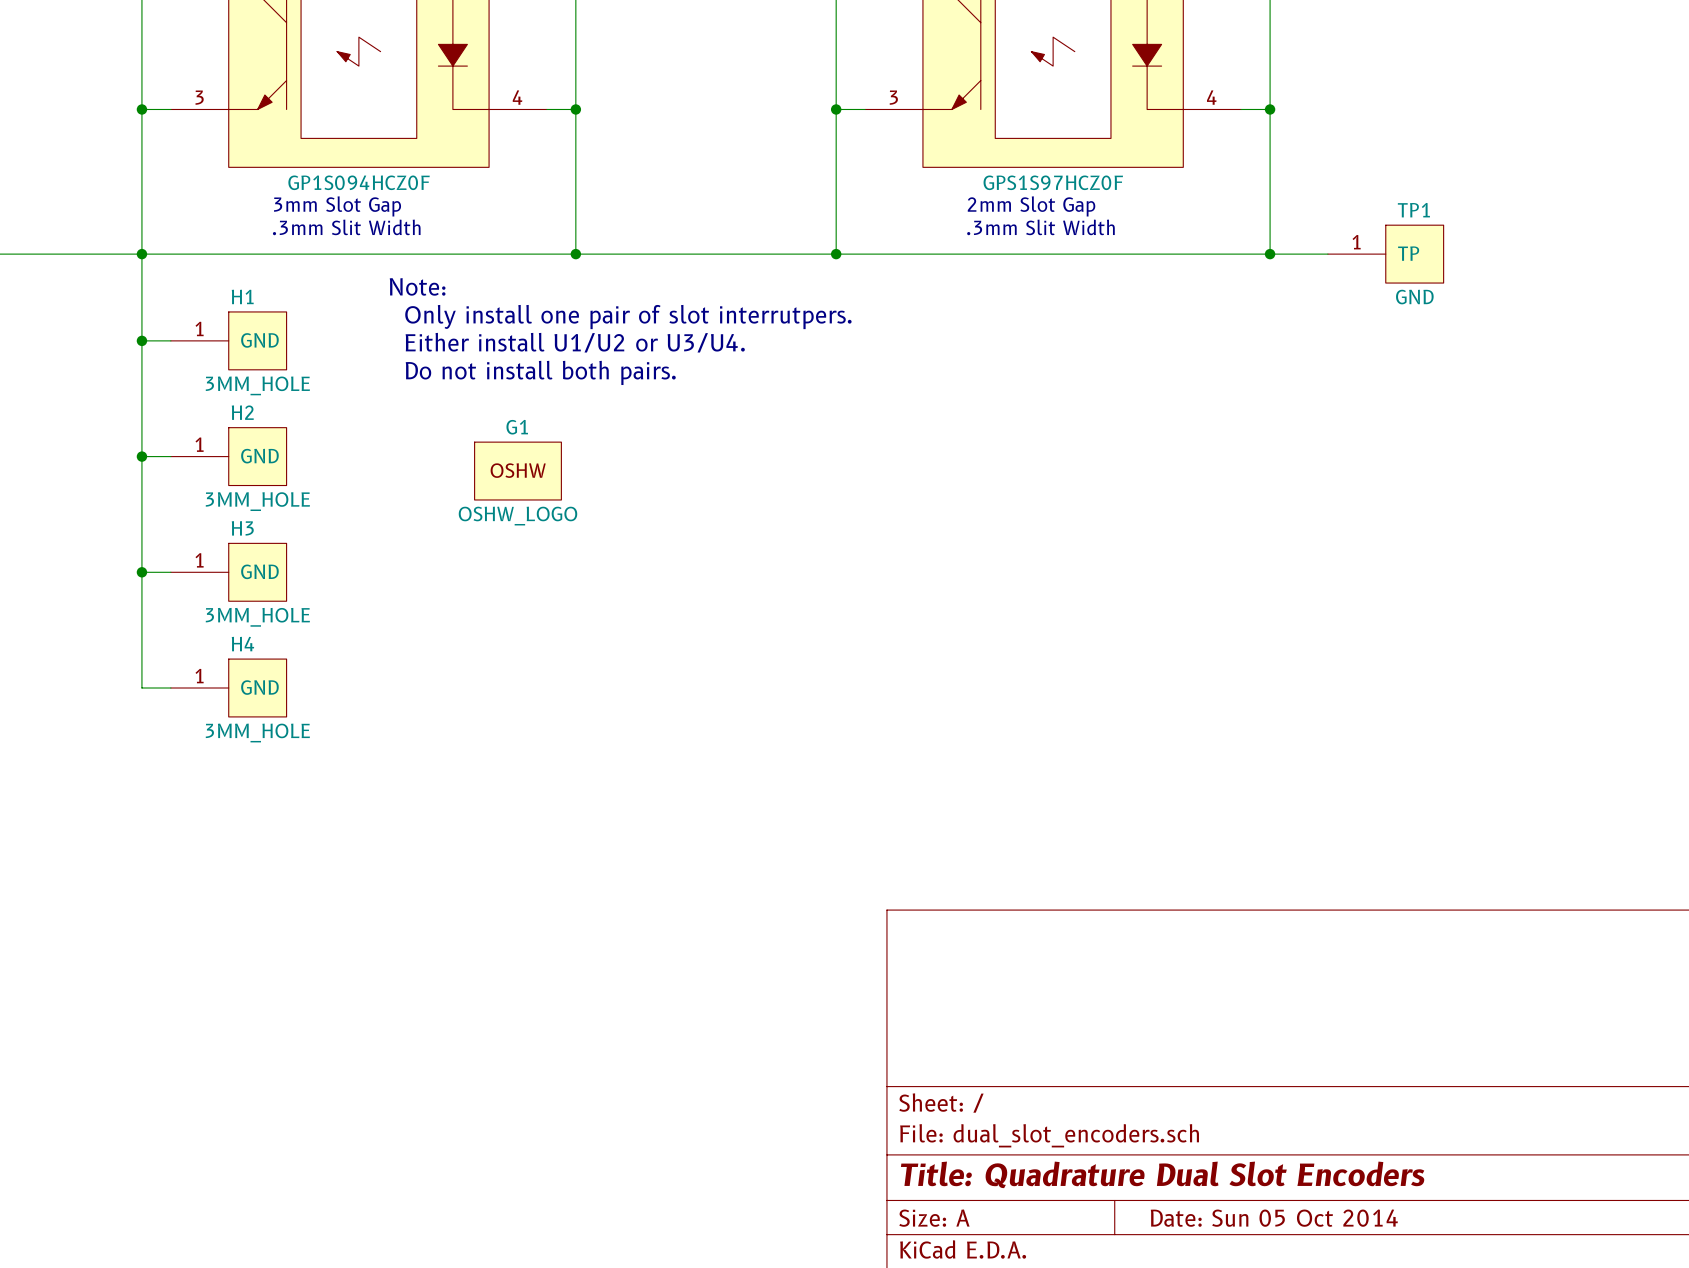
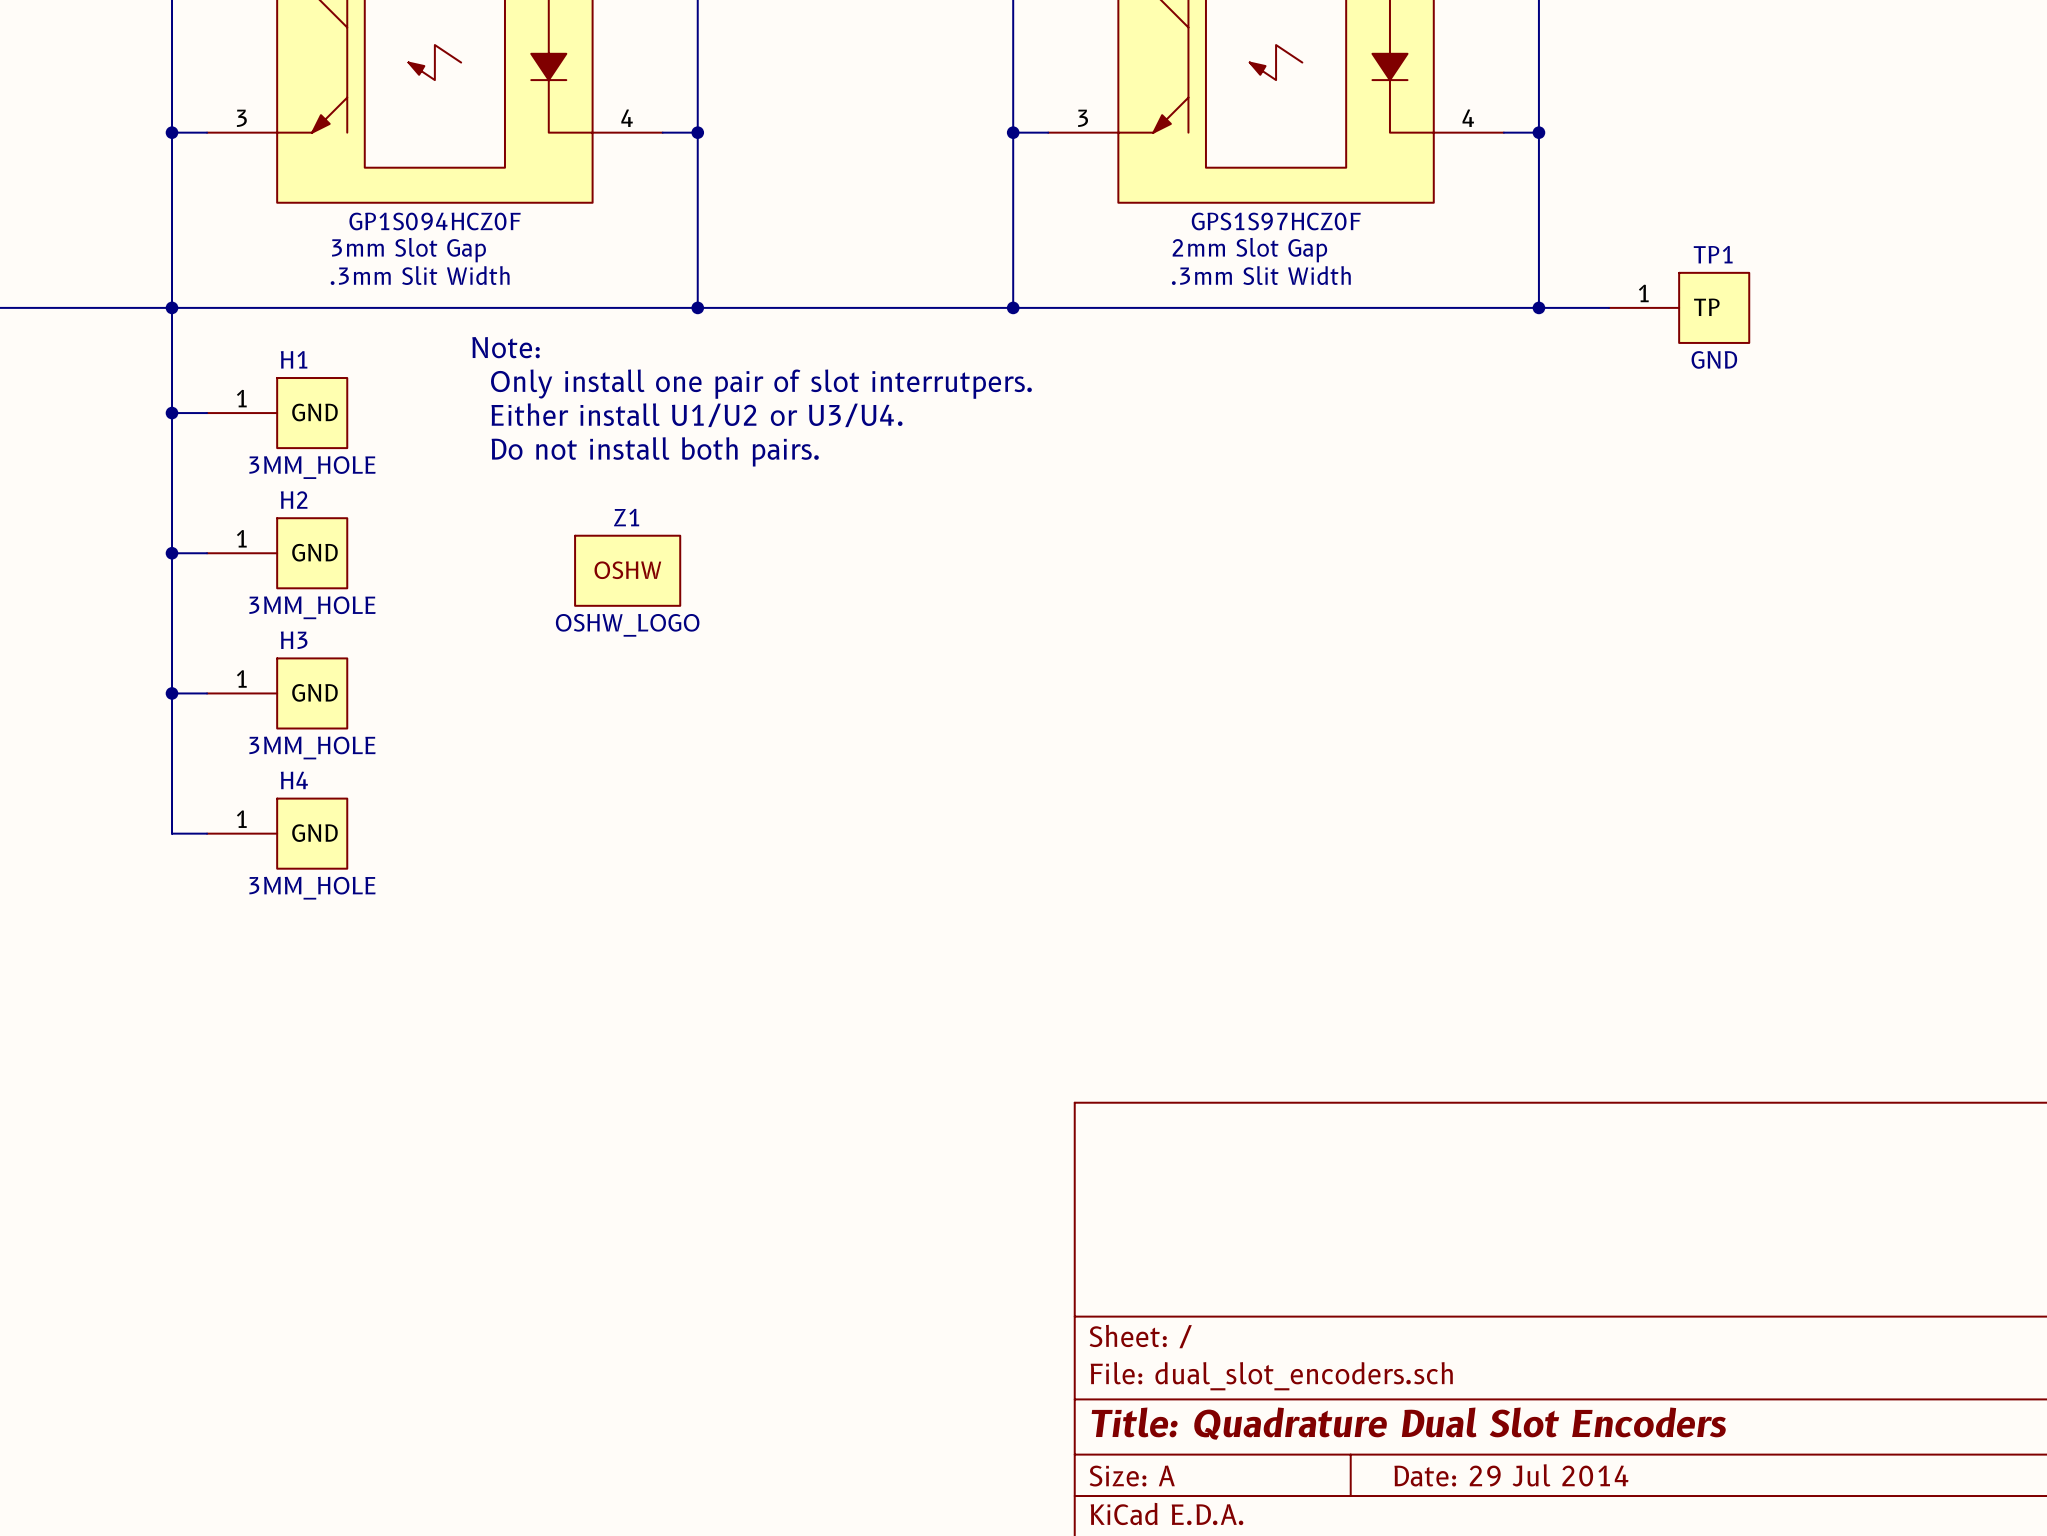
G1 name: G1 (517, 427) -> Z1 (626, 517)
title block: Date: Sun 05 Oct 2014 (1274, 1218) -> Date: 29 Jul 2014 (1511, 1475)

